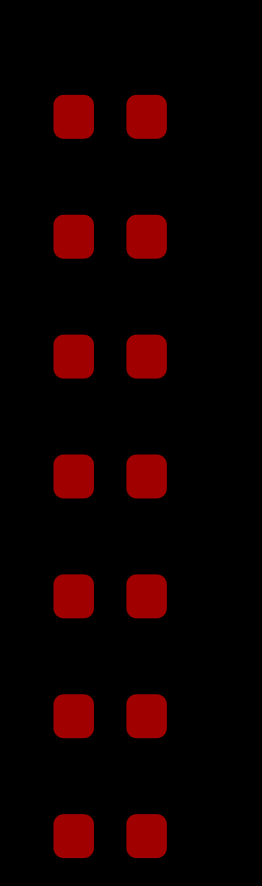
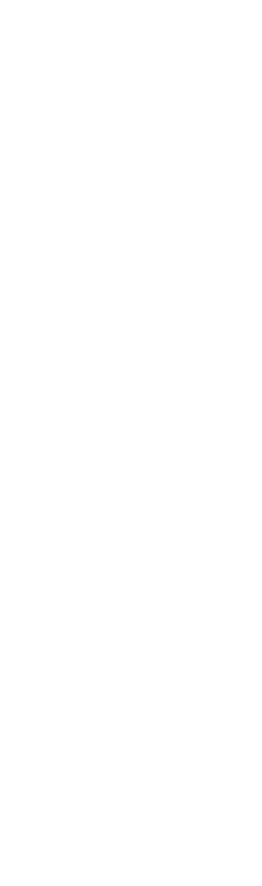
part: (110, 116) -> none
part: (110, 236) -> none
part: (110, 356) -> none
part: (110, 476) -> none
part: (110, 596) -> none
part: (110, 716) -> none
part: (110, 836) -> none

